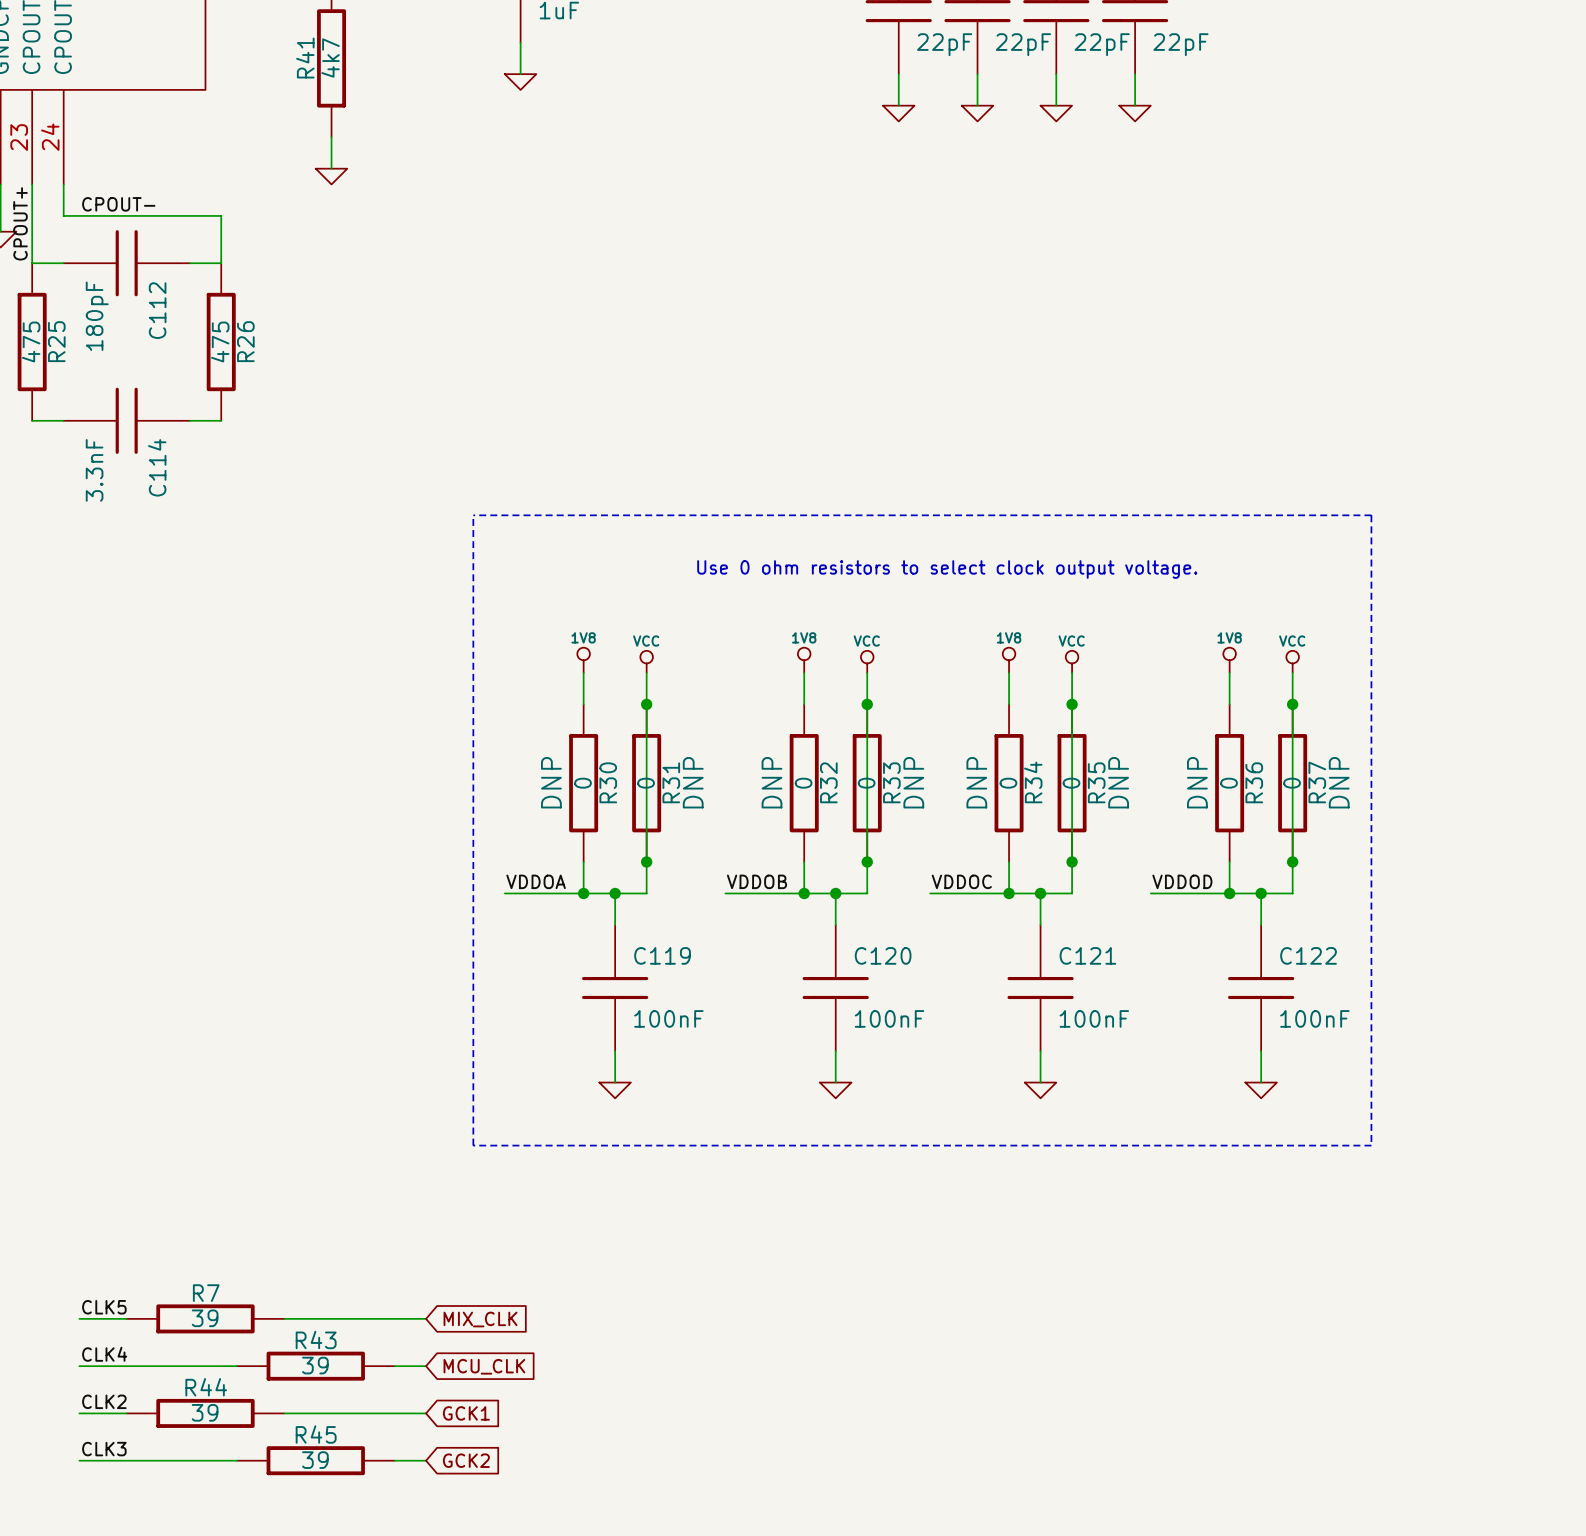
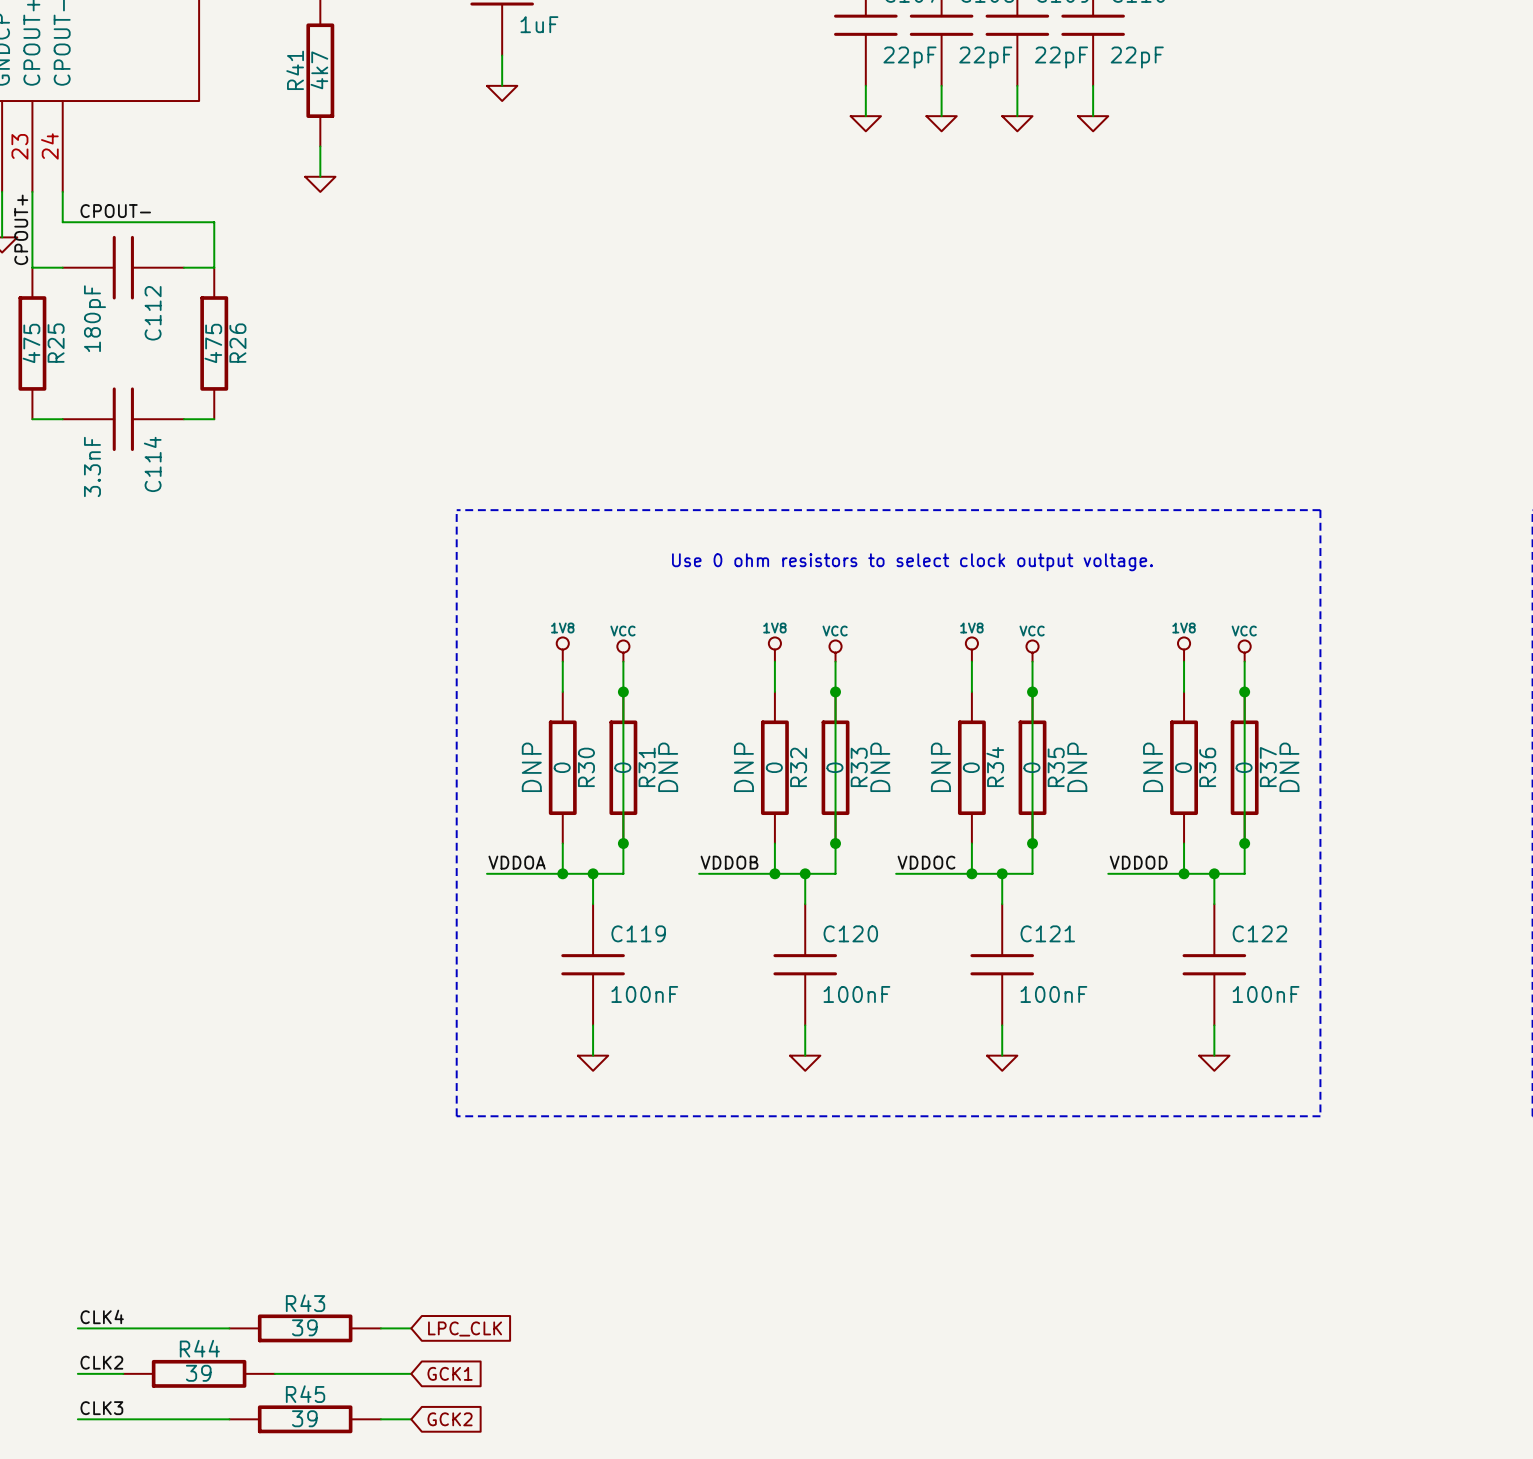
label: CLK5 (104, 1307) -> none
wire: (79, 1318) (126, 1318) -> none
R7: 39 (205, 1318) -> none
wire: (284, 1318) (426, 1318) -> none
global label: MIX_CLK (480, 1319) -> none
global label: MCU_CLK (484, 1366) -> LPC_CLK (465, 1328)

